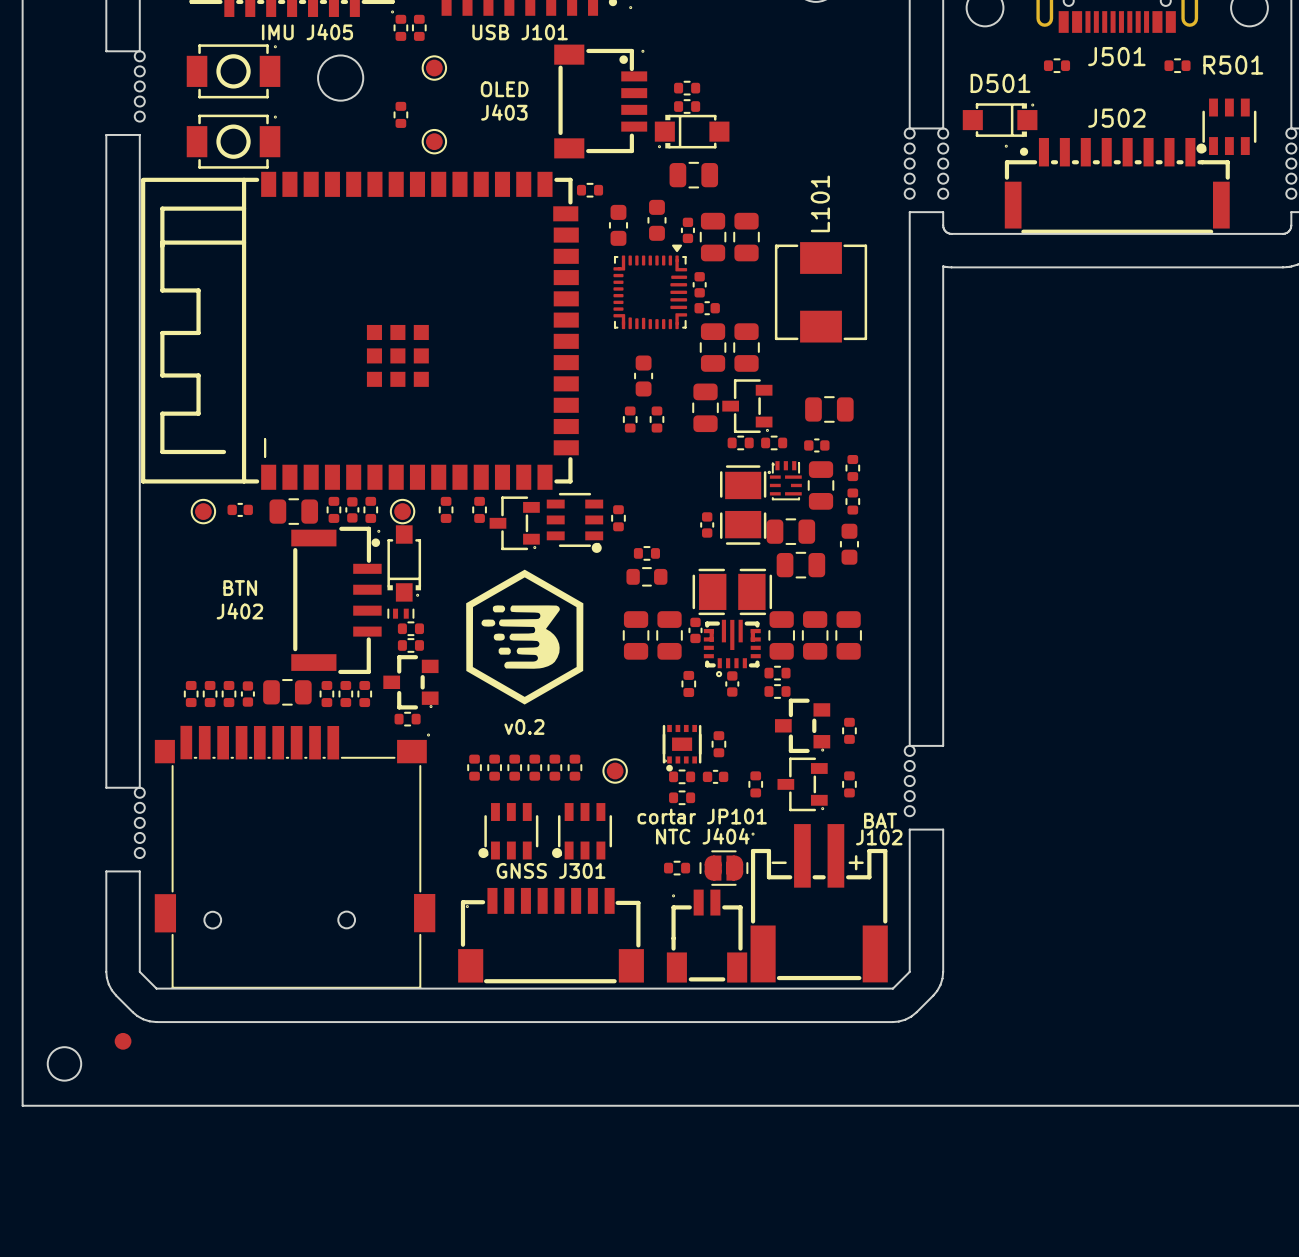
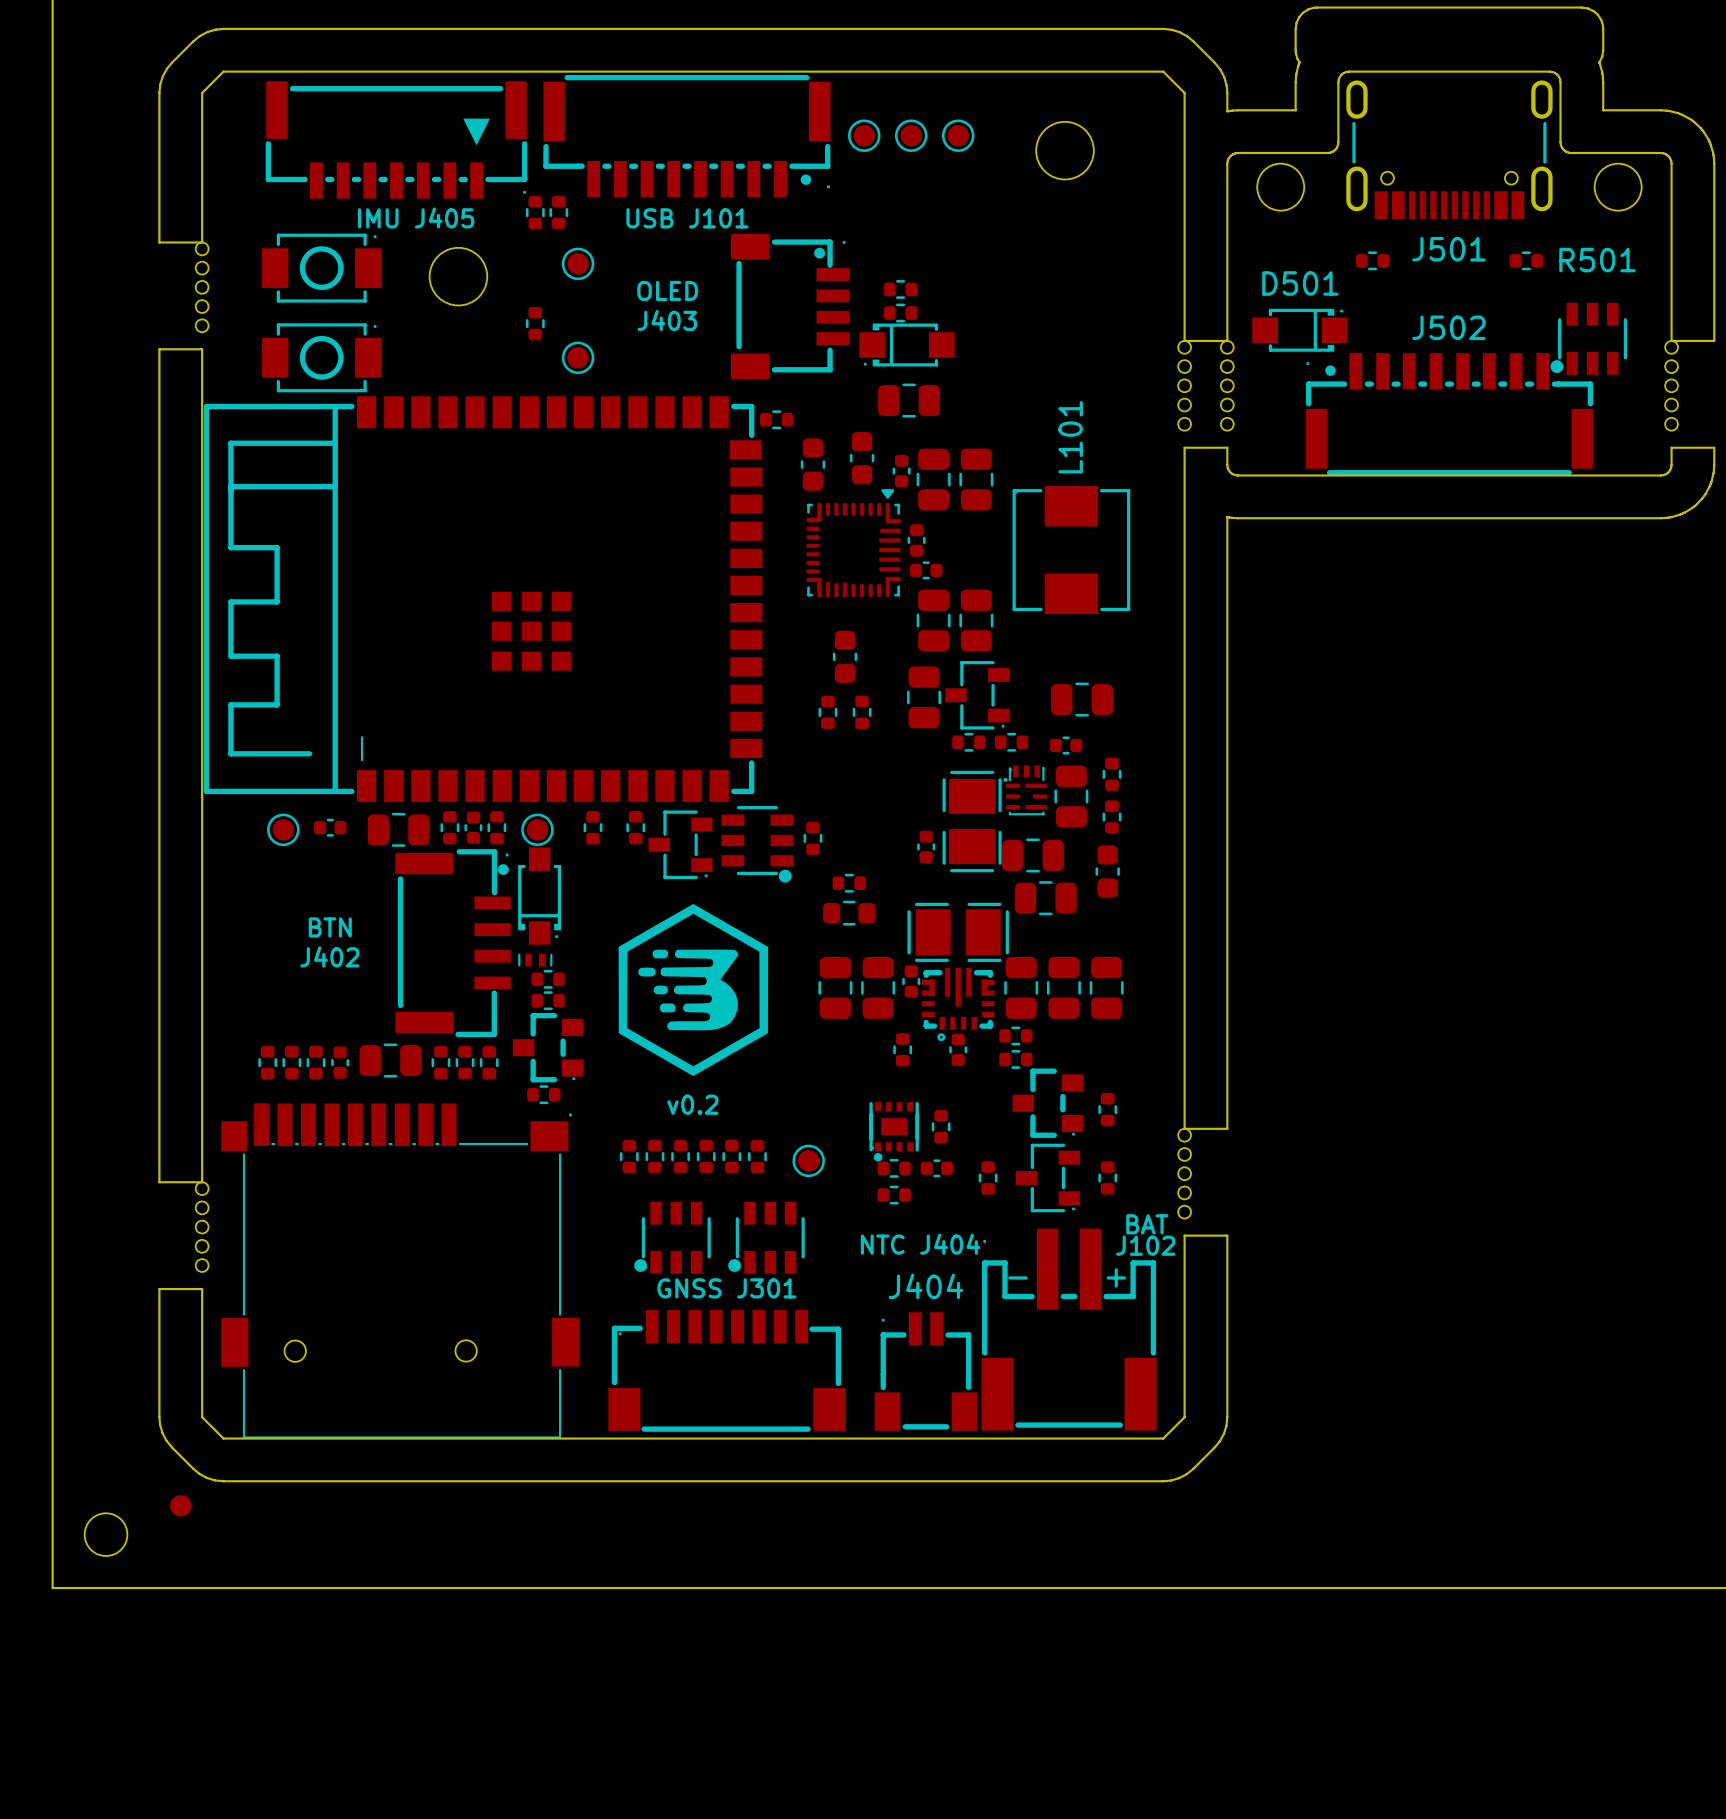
text: cortar JP101 (702, 816) -> none
part: (677, 868) -> none
part: (723, 868) -> none
J404 name: none -> J404 (925, 1286)

